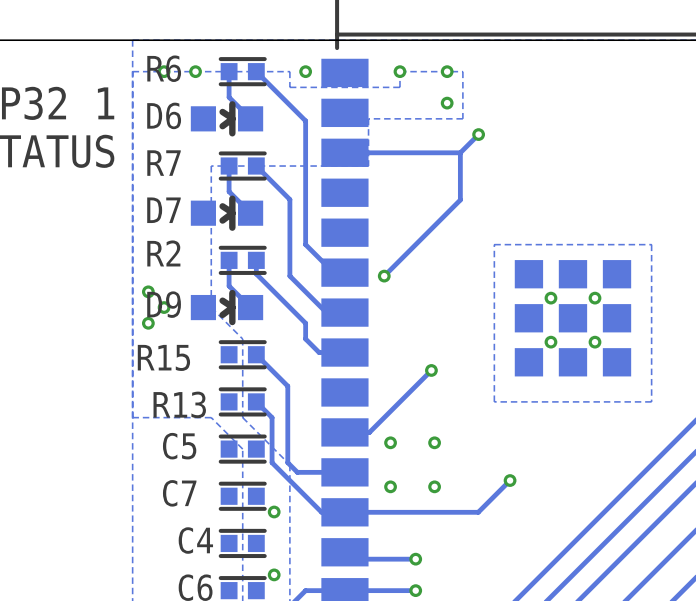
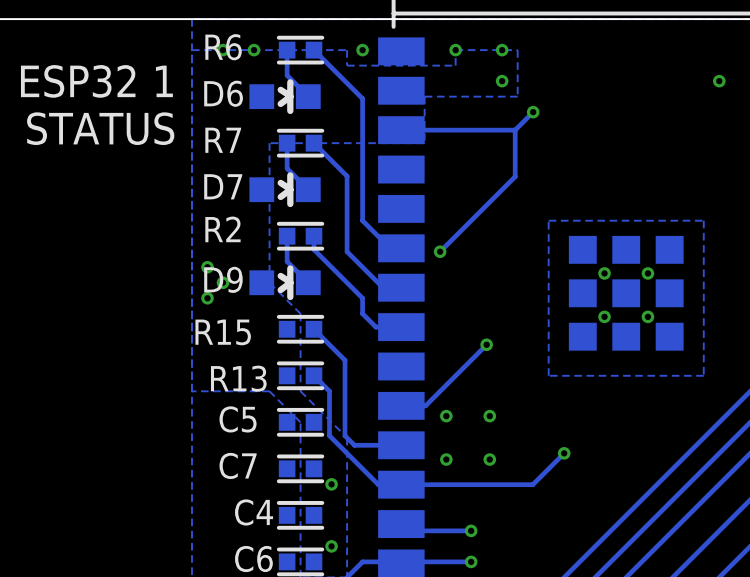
via: none -> (719, 81)

